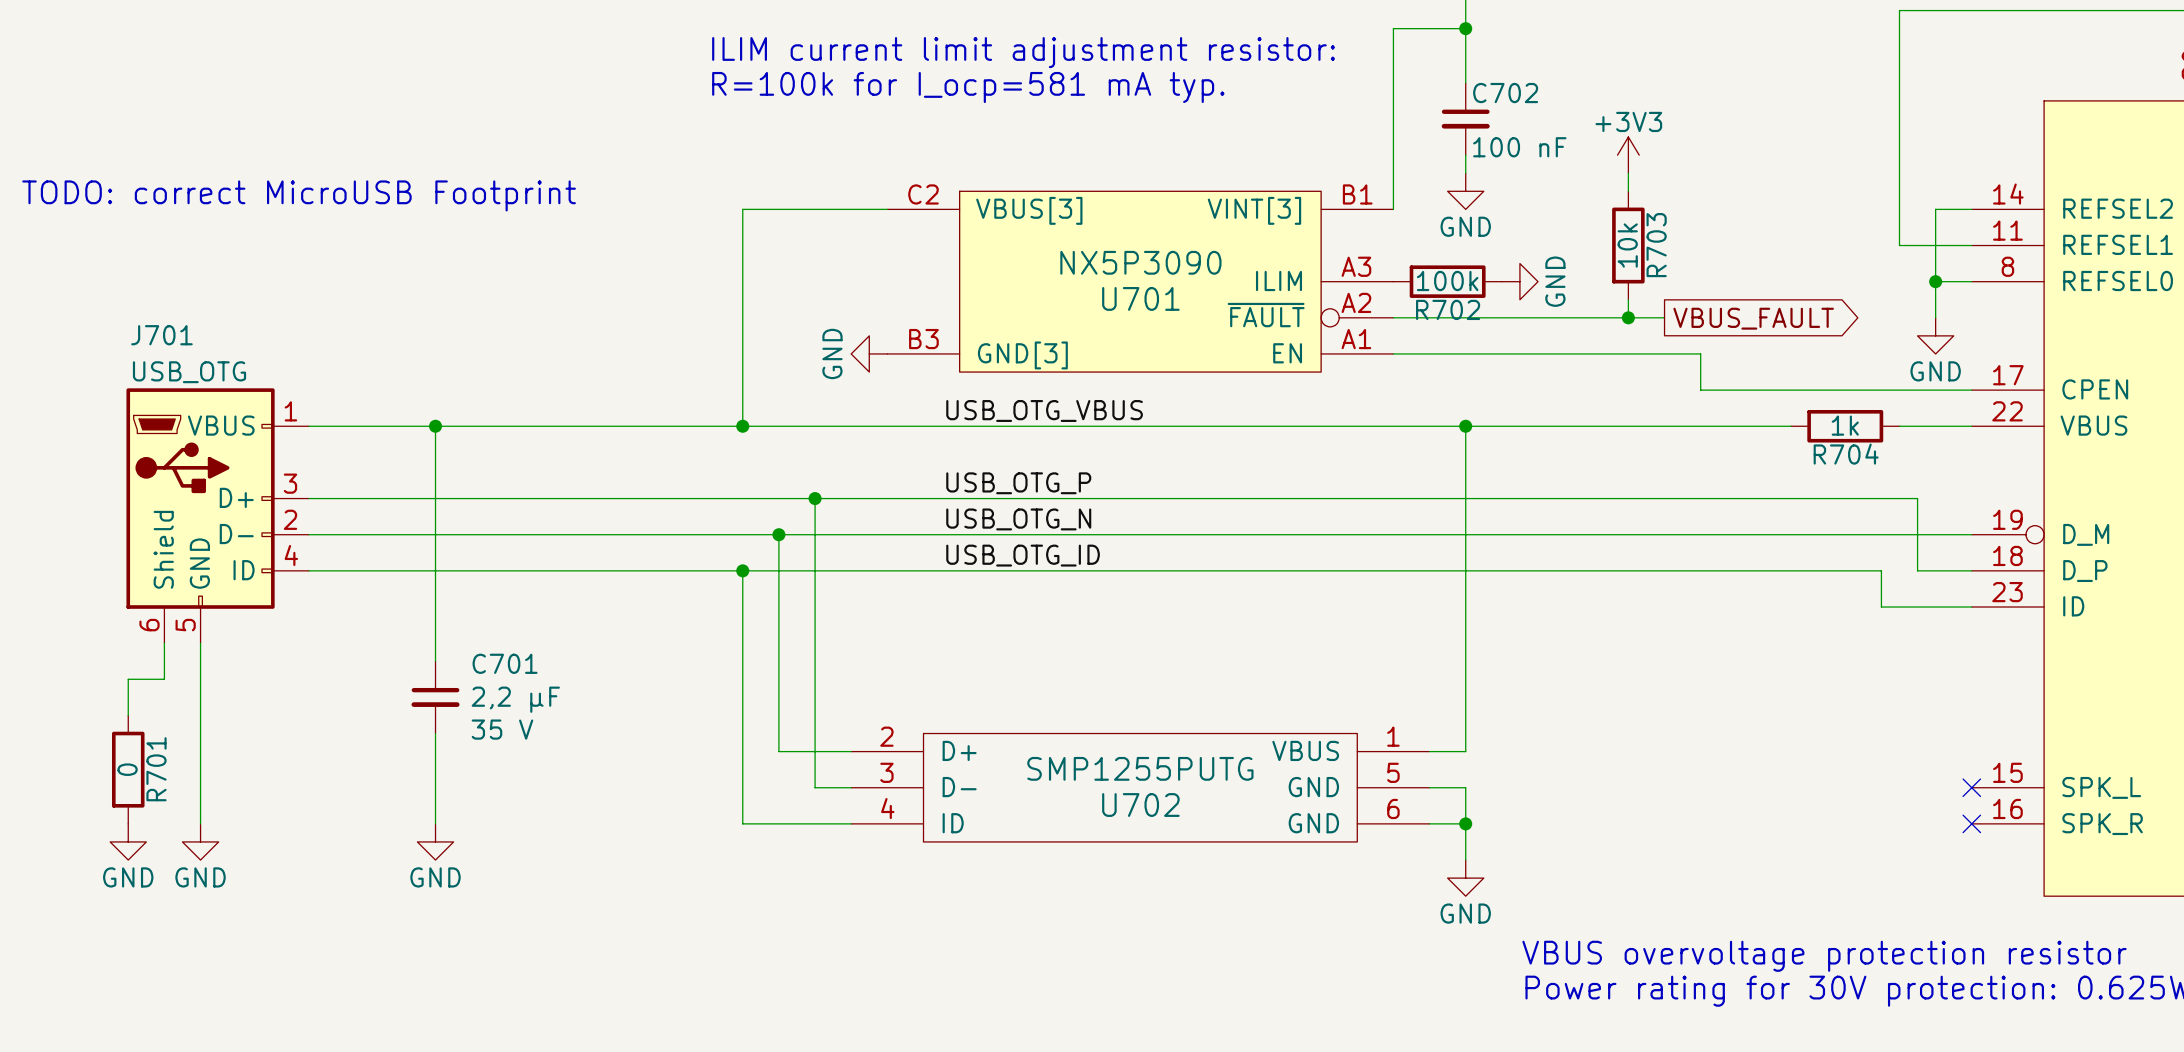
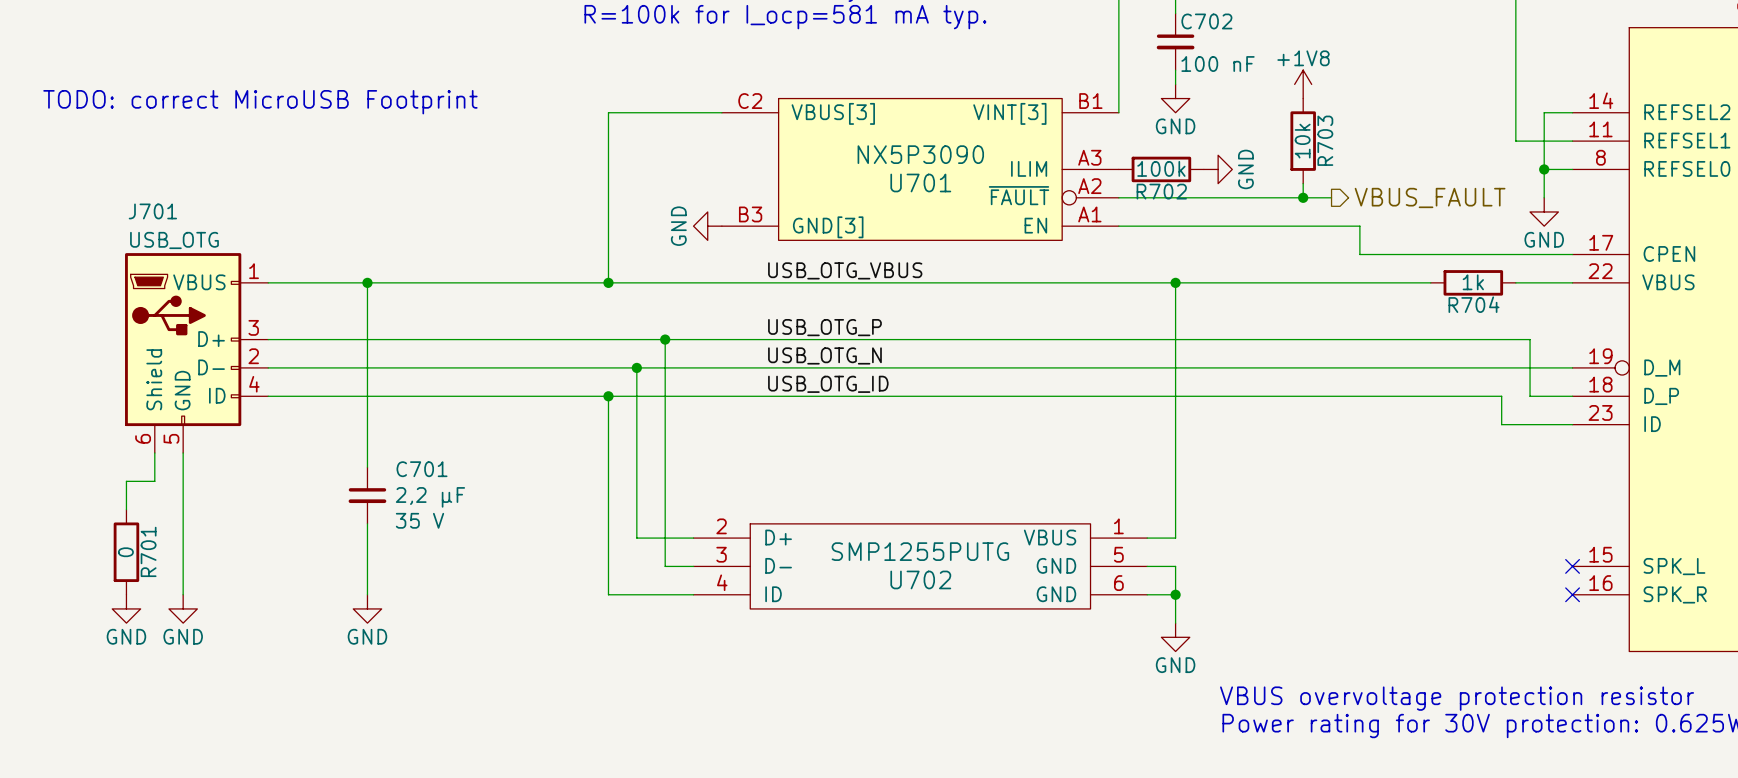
power symbol: +3V3 (1628, 155) -> none
power symbol: none -> +1V8 (1303, 84)
global label: VBUS_FAULT (1753, 318) -> none
hierarchical label: none -> VBUS_FAULT (1430, 197)

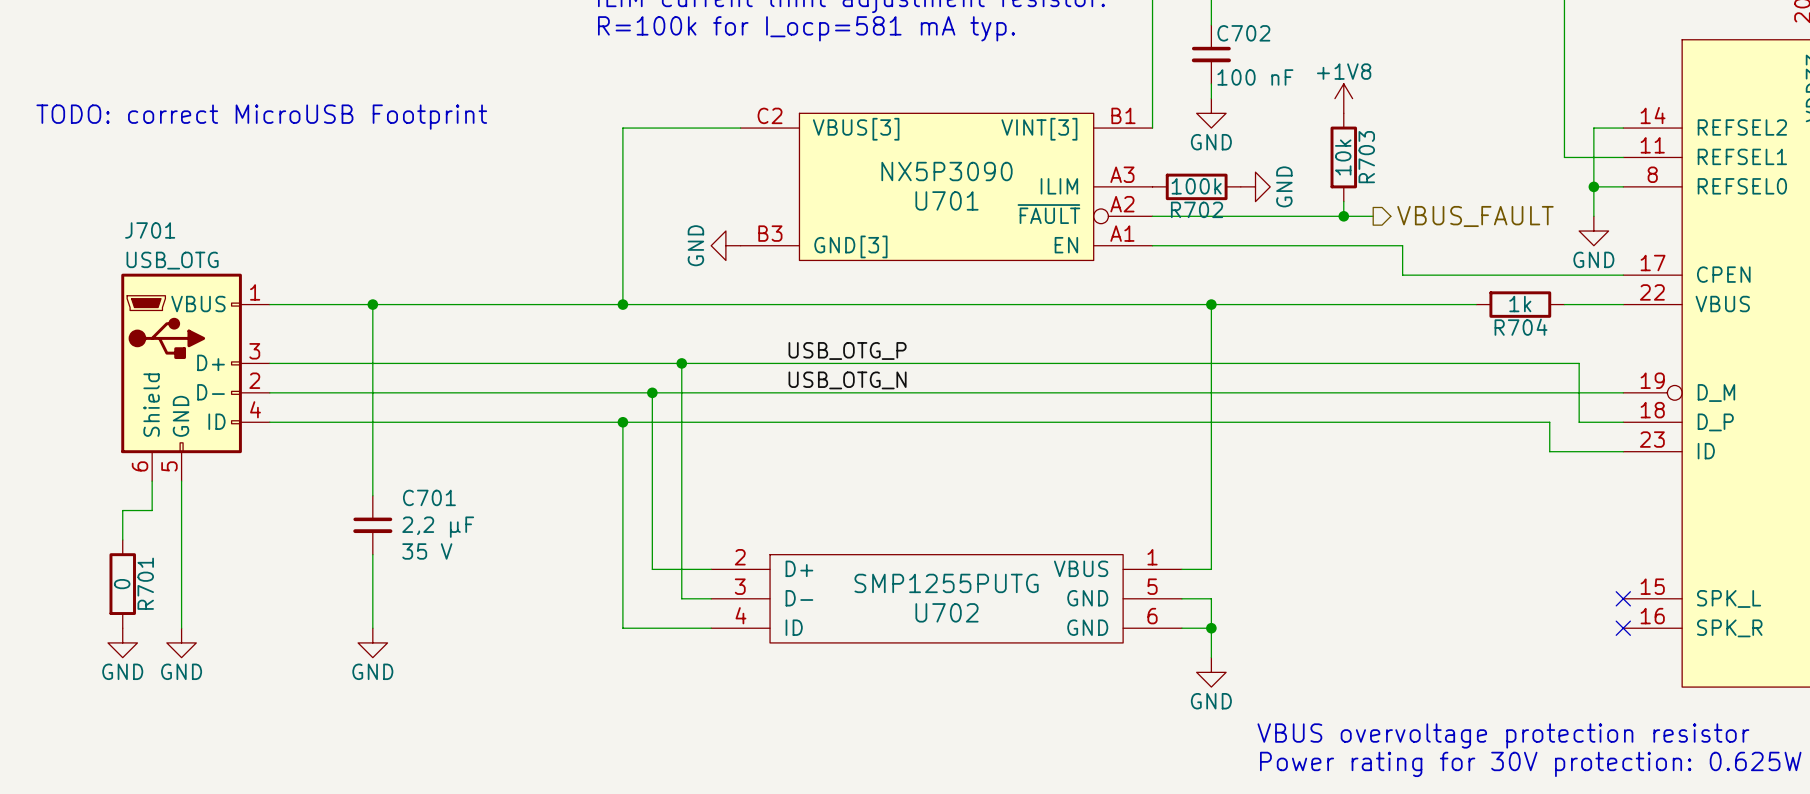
label: USB_OTG_VBUS (845, 270) -> none
label: USB_OTG_ID (828, 384) -> none

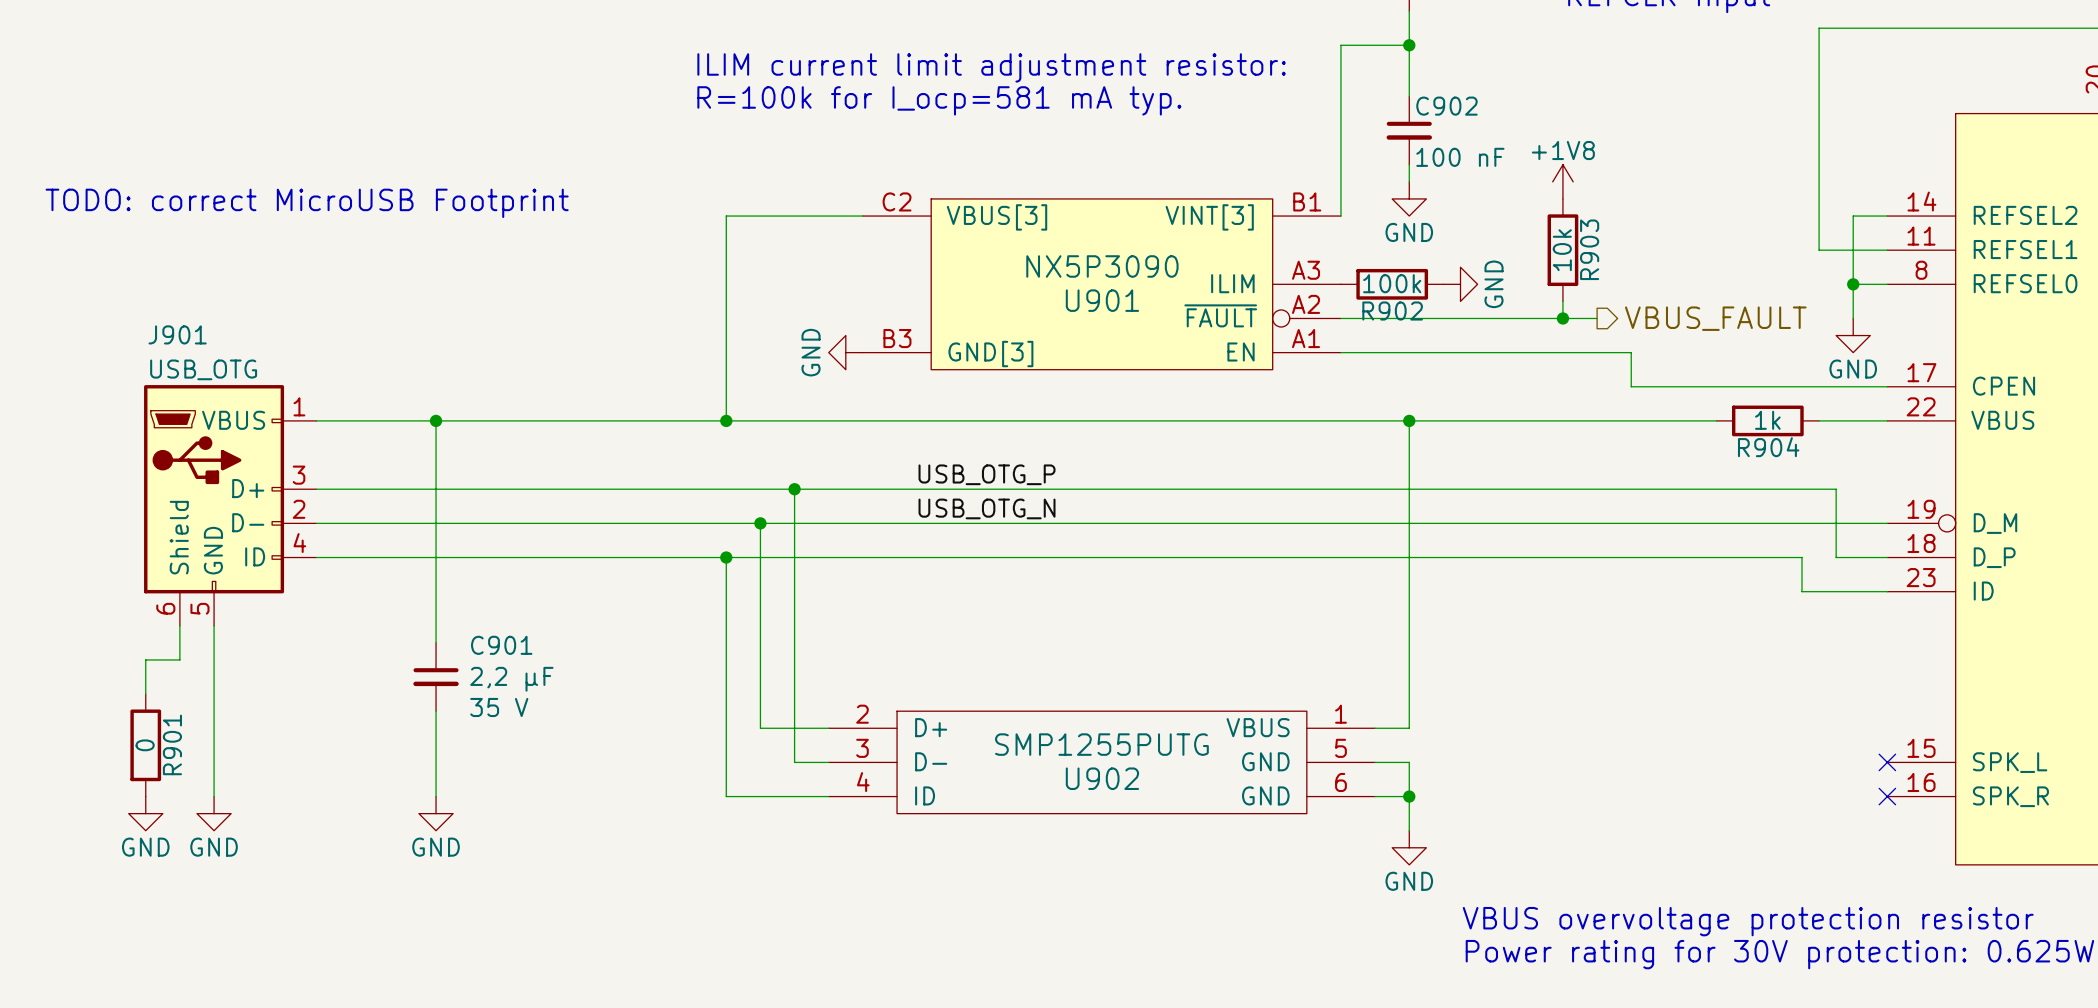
C702 name: C702 (1243, 33) -> C902 (1446, 106)
R703 name: R703 (1366, 157) -> R903 (1589, 249)
U701 name: U701 (946, 200) -> U901 (1102, 300)
R702 name: R702 (1197, 209) -> R902 (1392, 311)
J701 name: J701 (150, 230) -> J901 (177, 334)
R704 name: R704 (1521, 327) -> R904 (1768, 447)
C701 name: C701 (429, 497) -> C901 (501, 645)
R701 name: R701 (145, 583) -> R901 (172, 744)
U702 name: U702 (946, 612) -> U902 (1102, 778)

